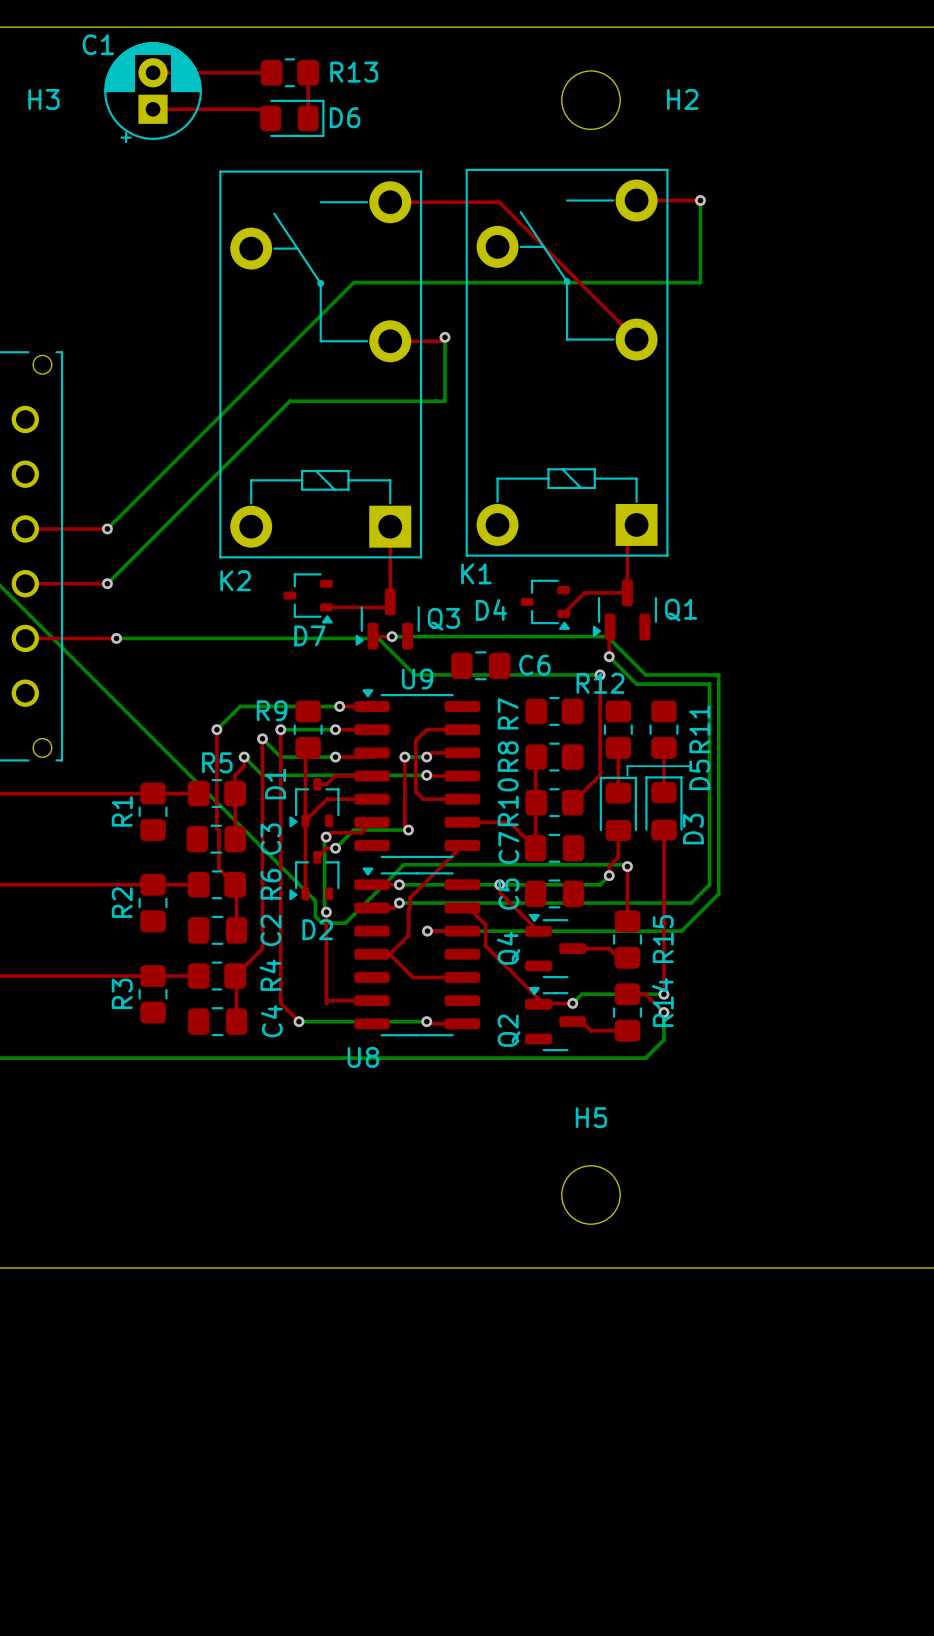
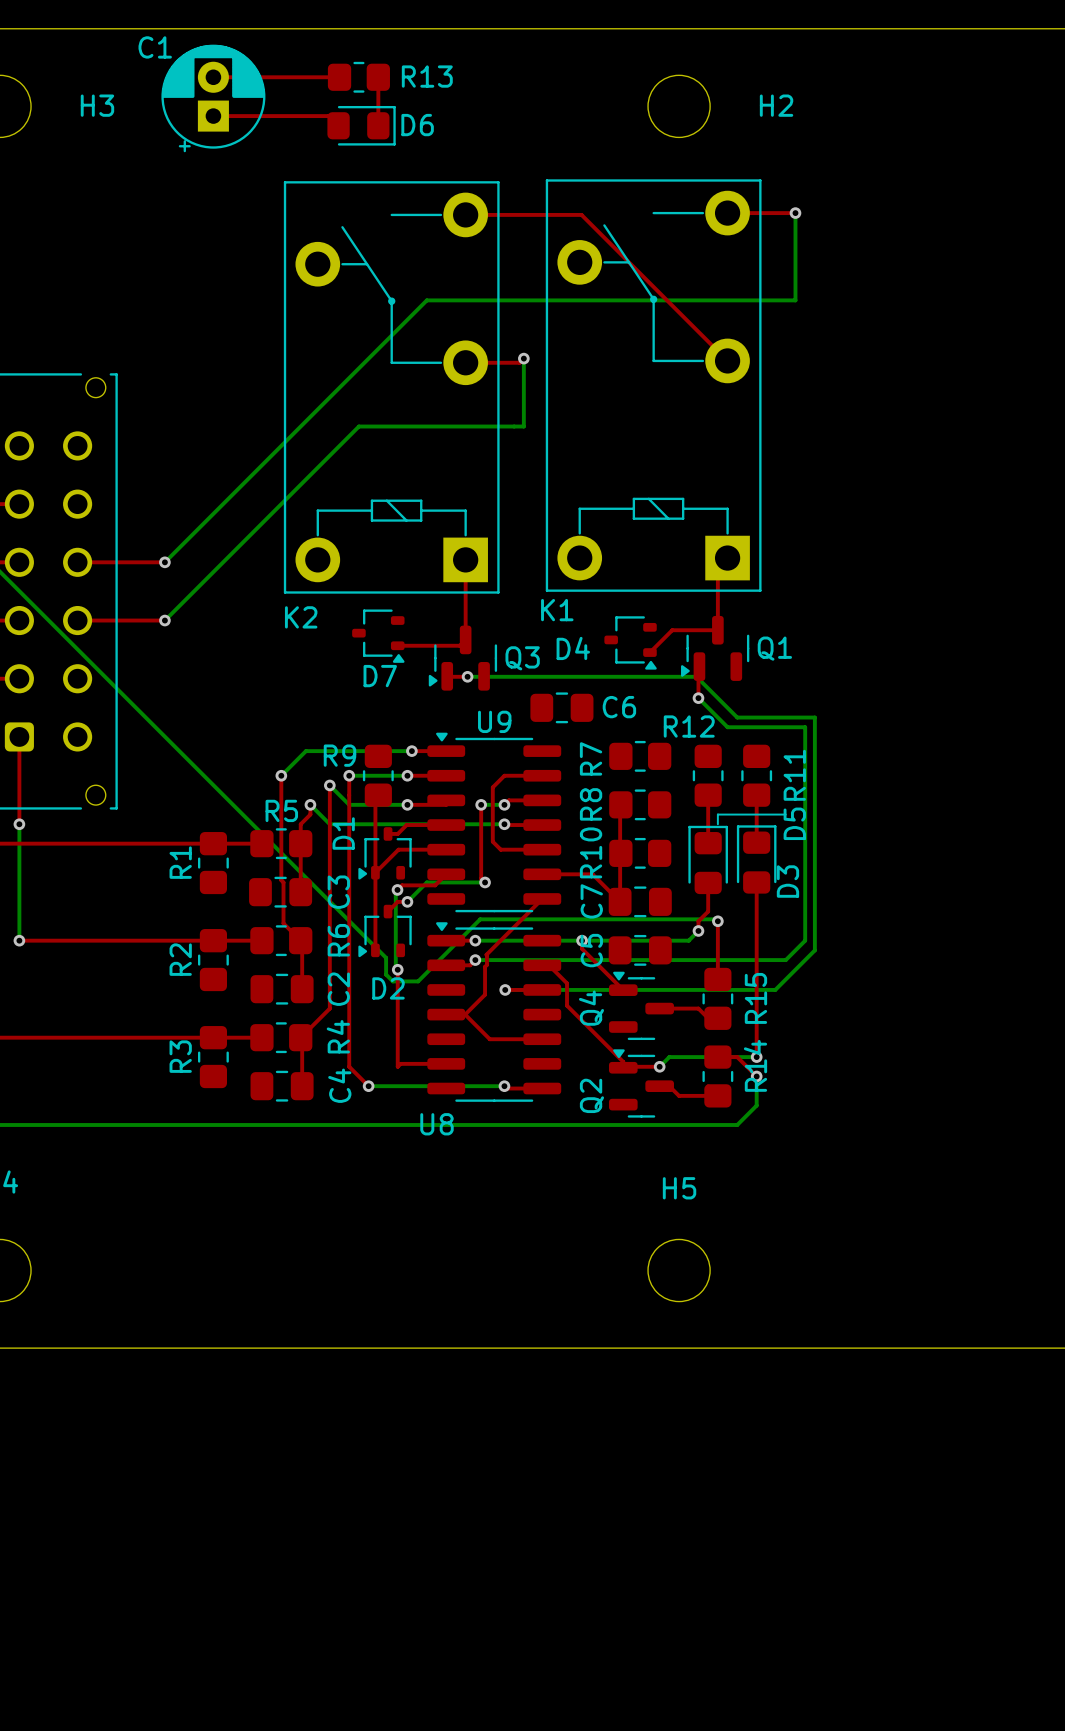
top track: (25, 638) (116, 638) -> none
bottom track: (116, 638) (378, 638) (414, 674) (600, 674) -> none
via: (116, 638) -> none
top track: (600, 674) (600, 775) (572, 802) -> none
via: (600, 674) -> none

